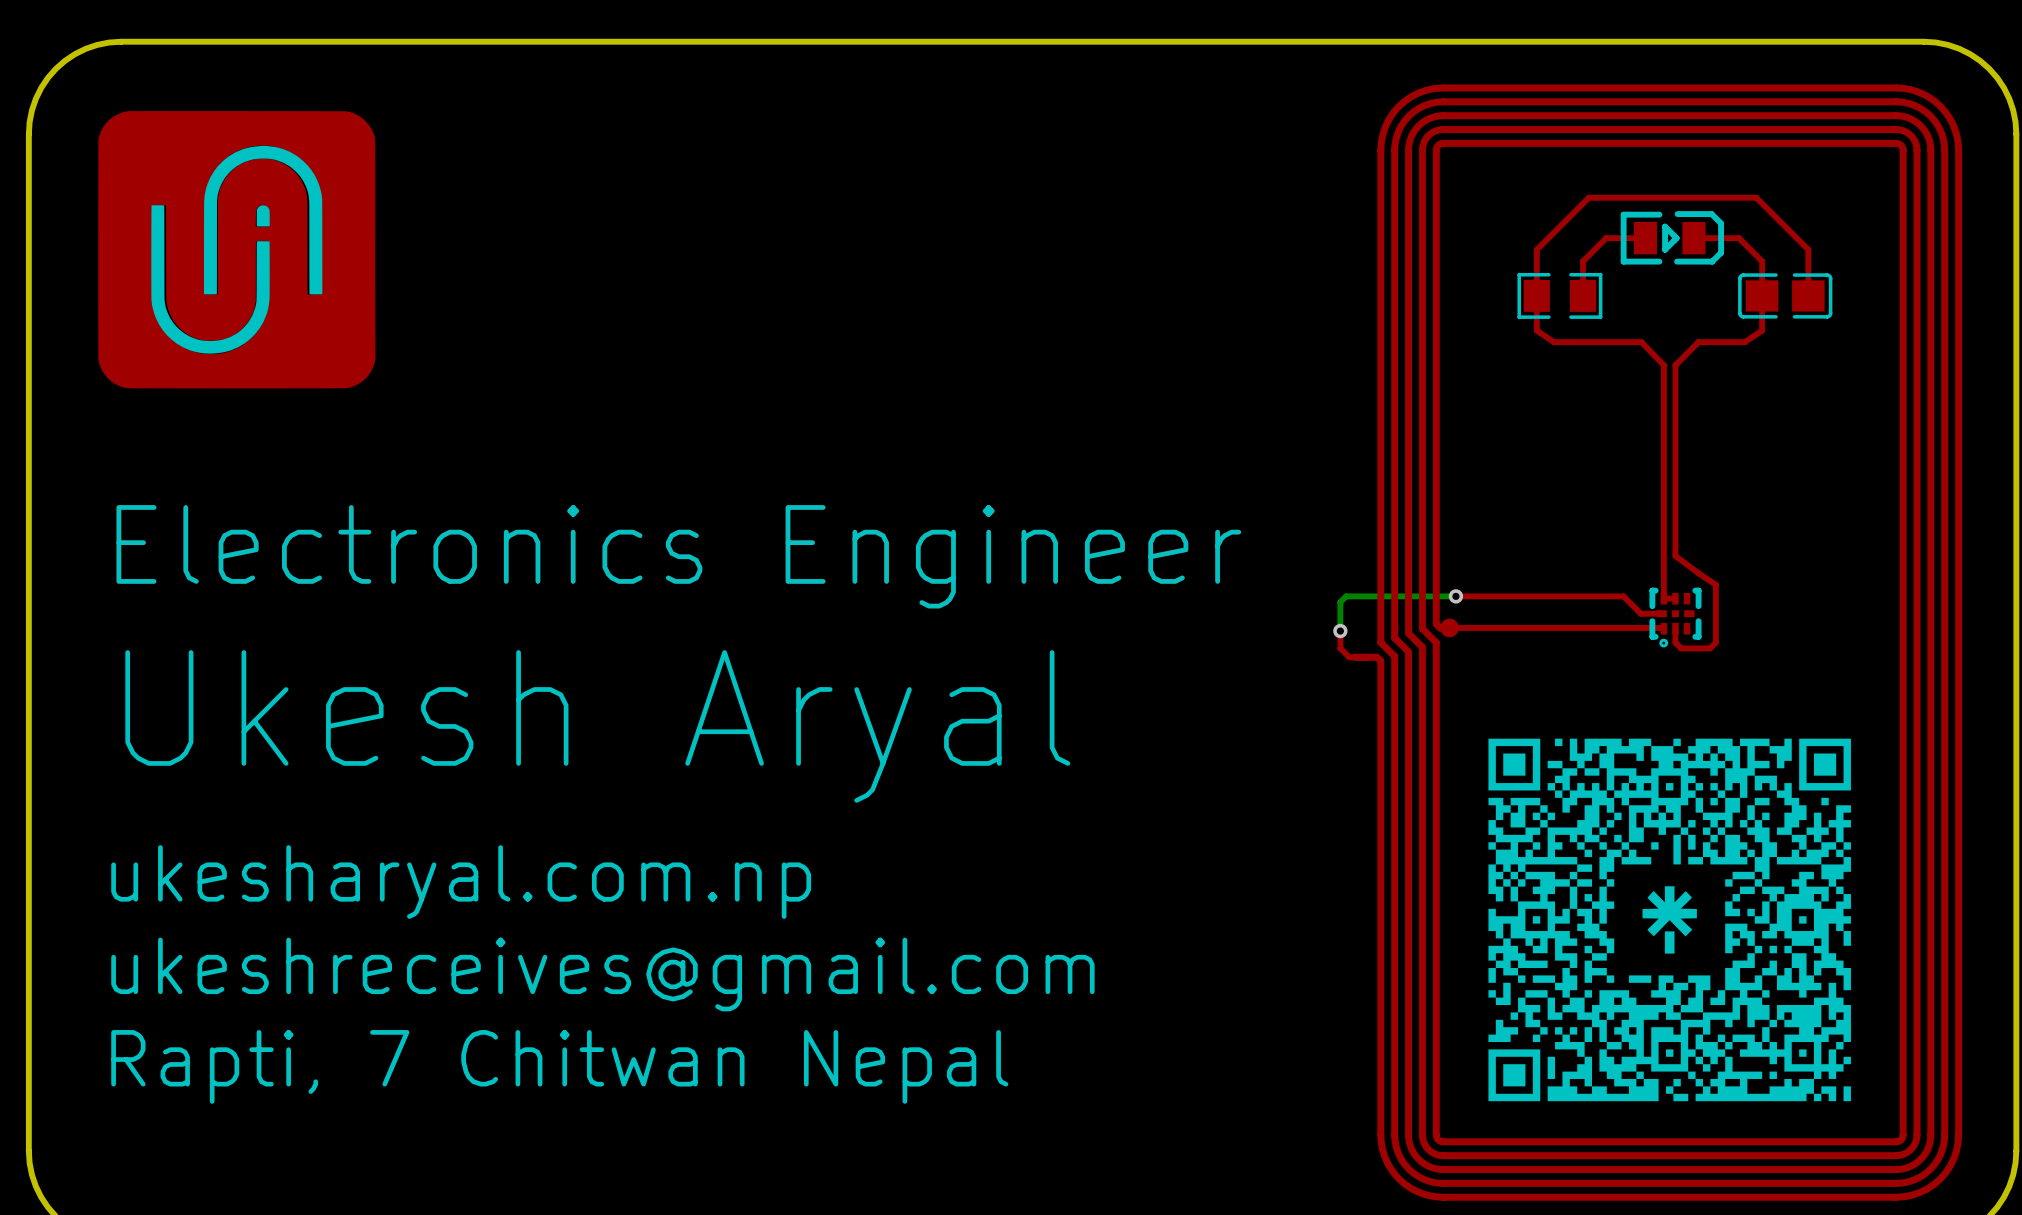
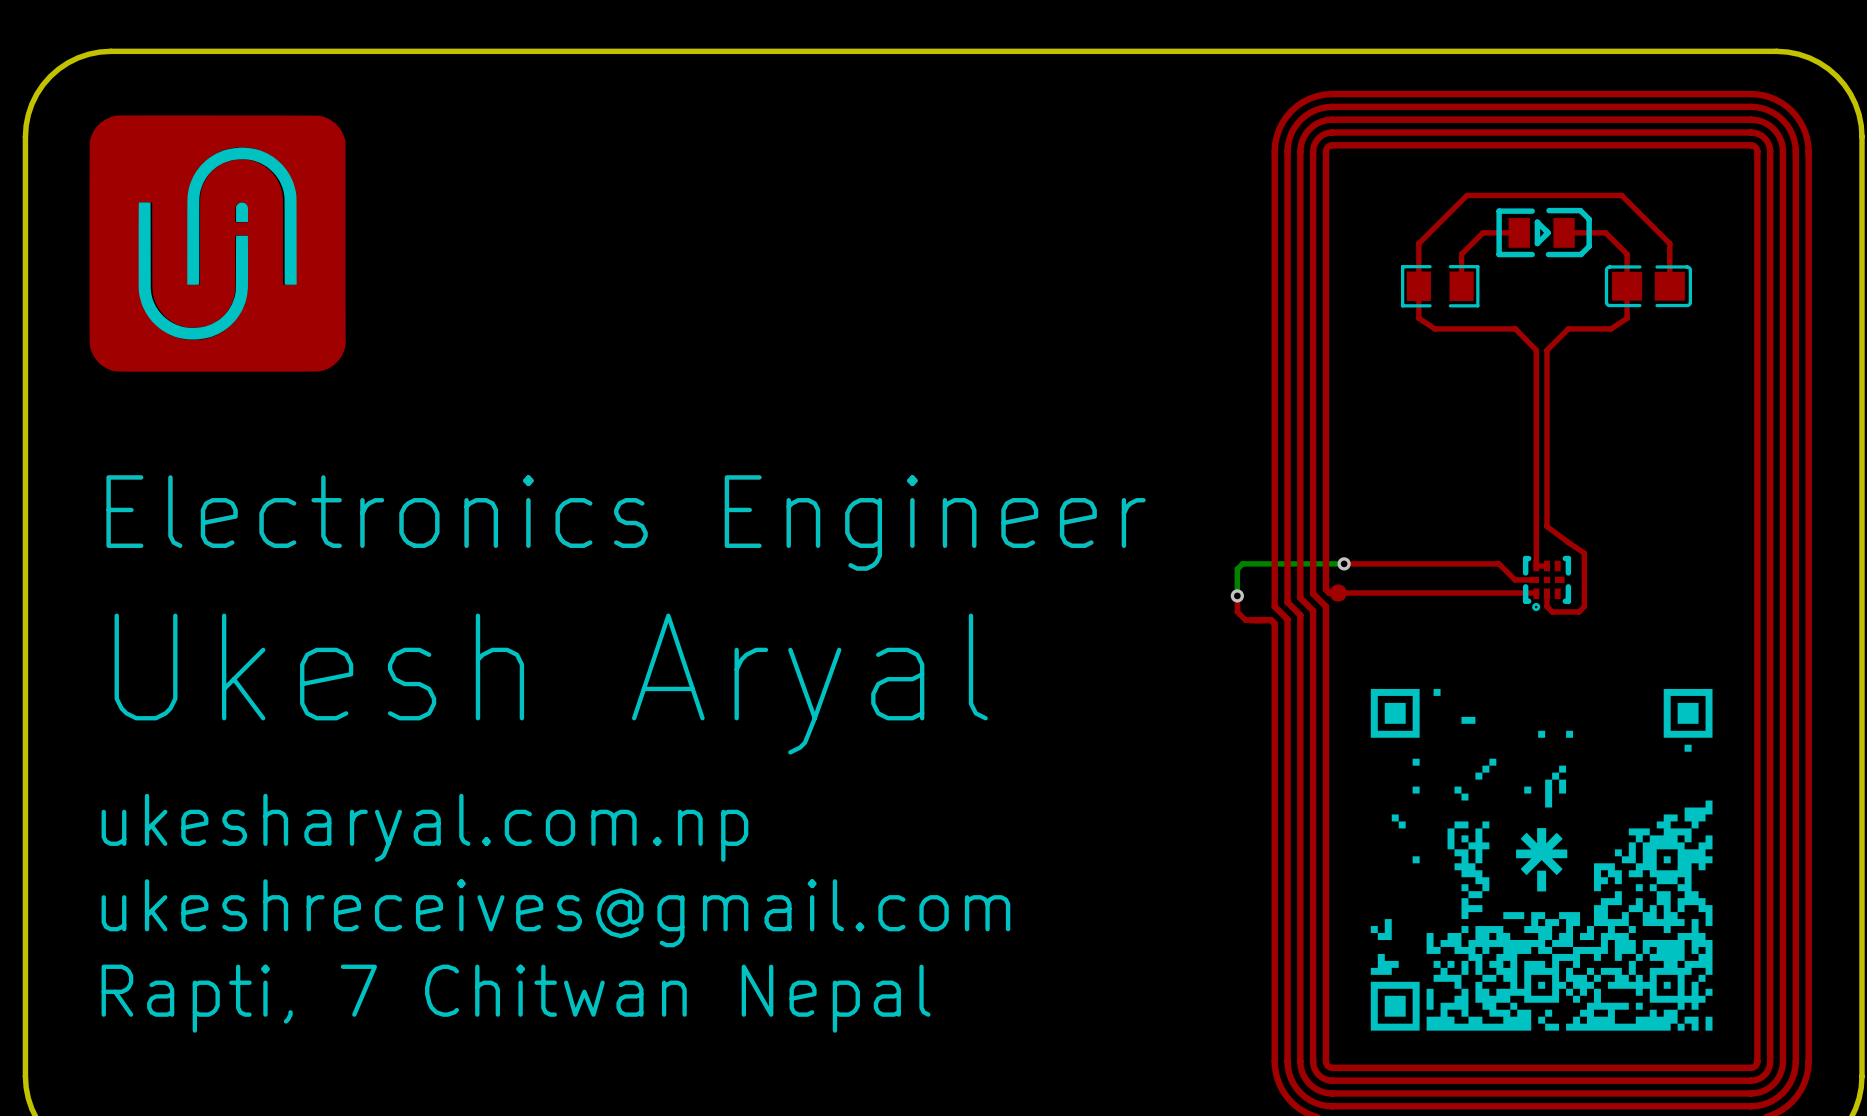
text: none -> Electronics Engineer (626, 522)
text: Electronics Engineer (678, 556) -> none
drawing: none -> [1370, 688, 1713, 1031]
drawing: none -> [1663, 688, 1713, 752]
drawing: [1488, 738, 1851, 1102] -> none
drawing: none -> [1461, 716, 1476, 724]
drawing: none -> [1538, 730, 1574, 738]

